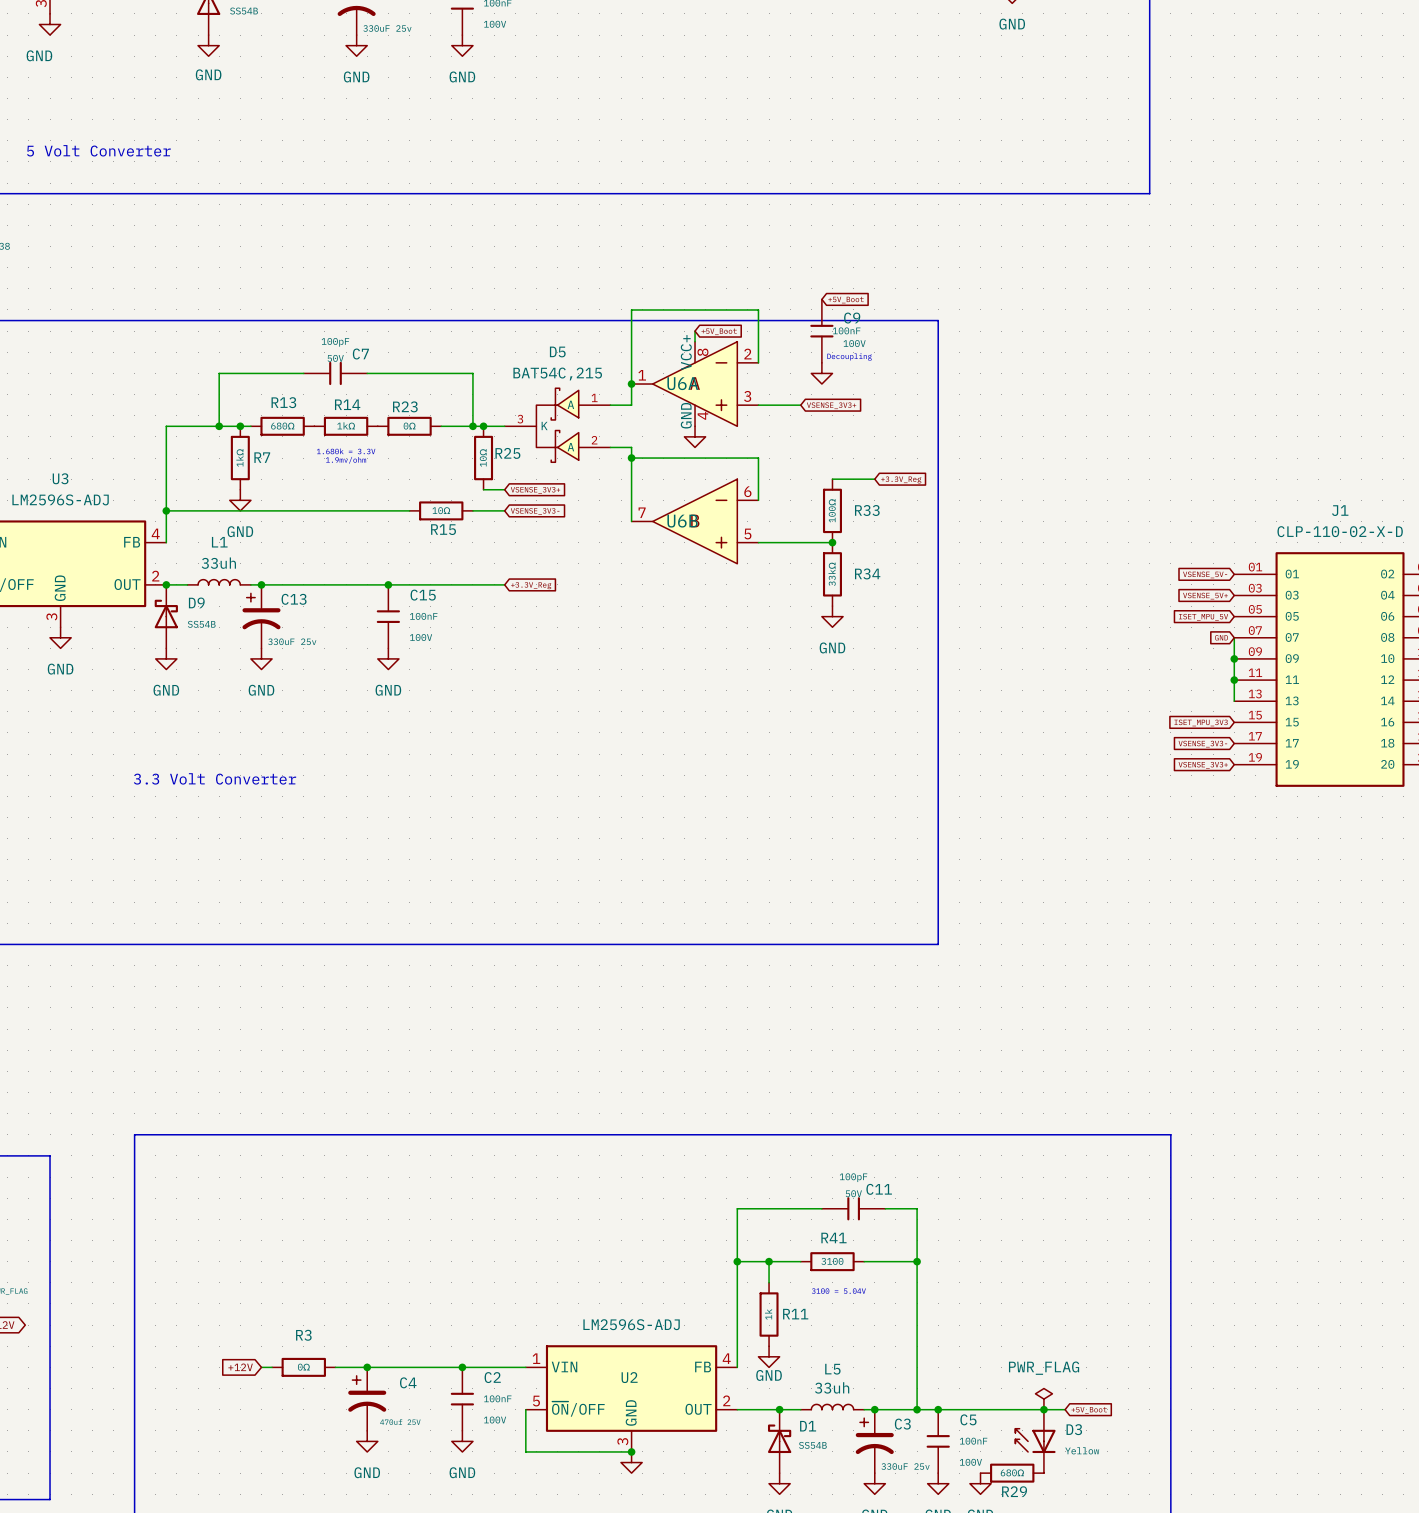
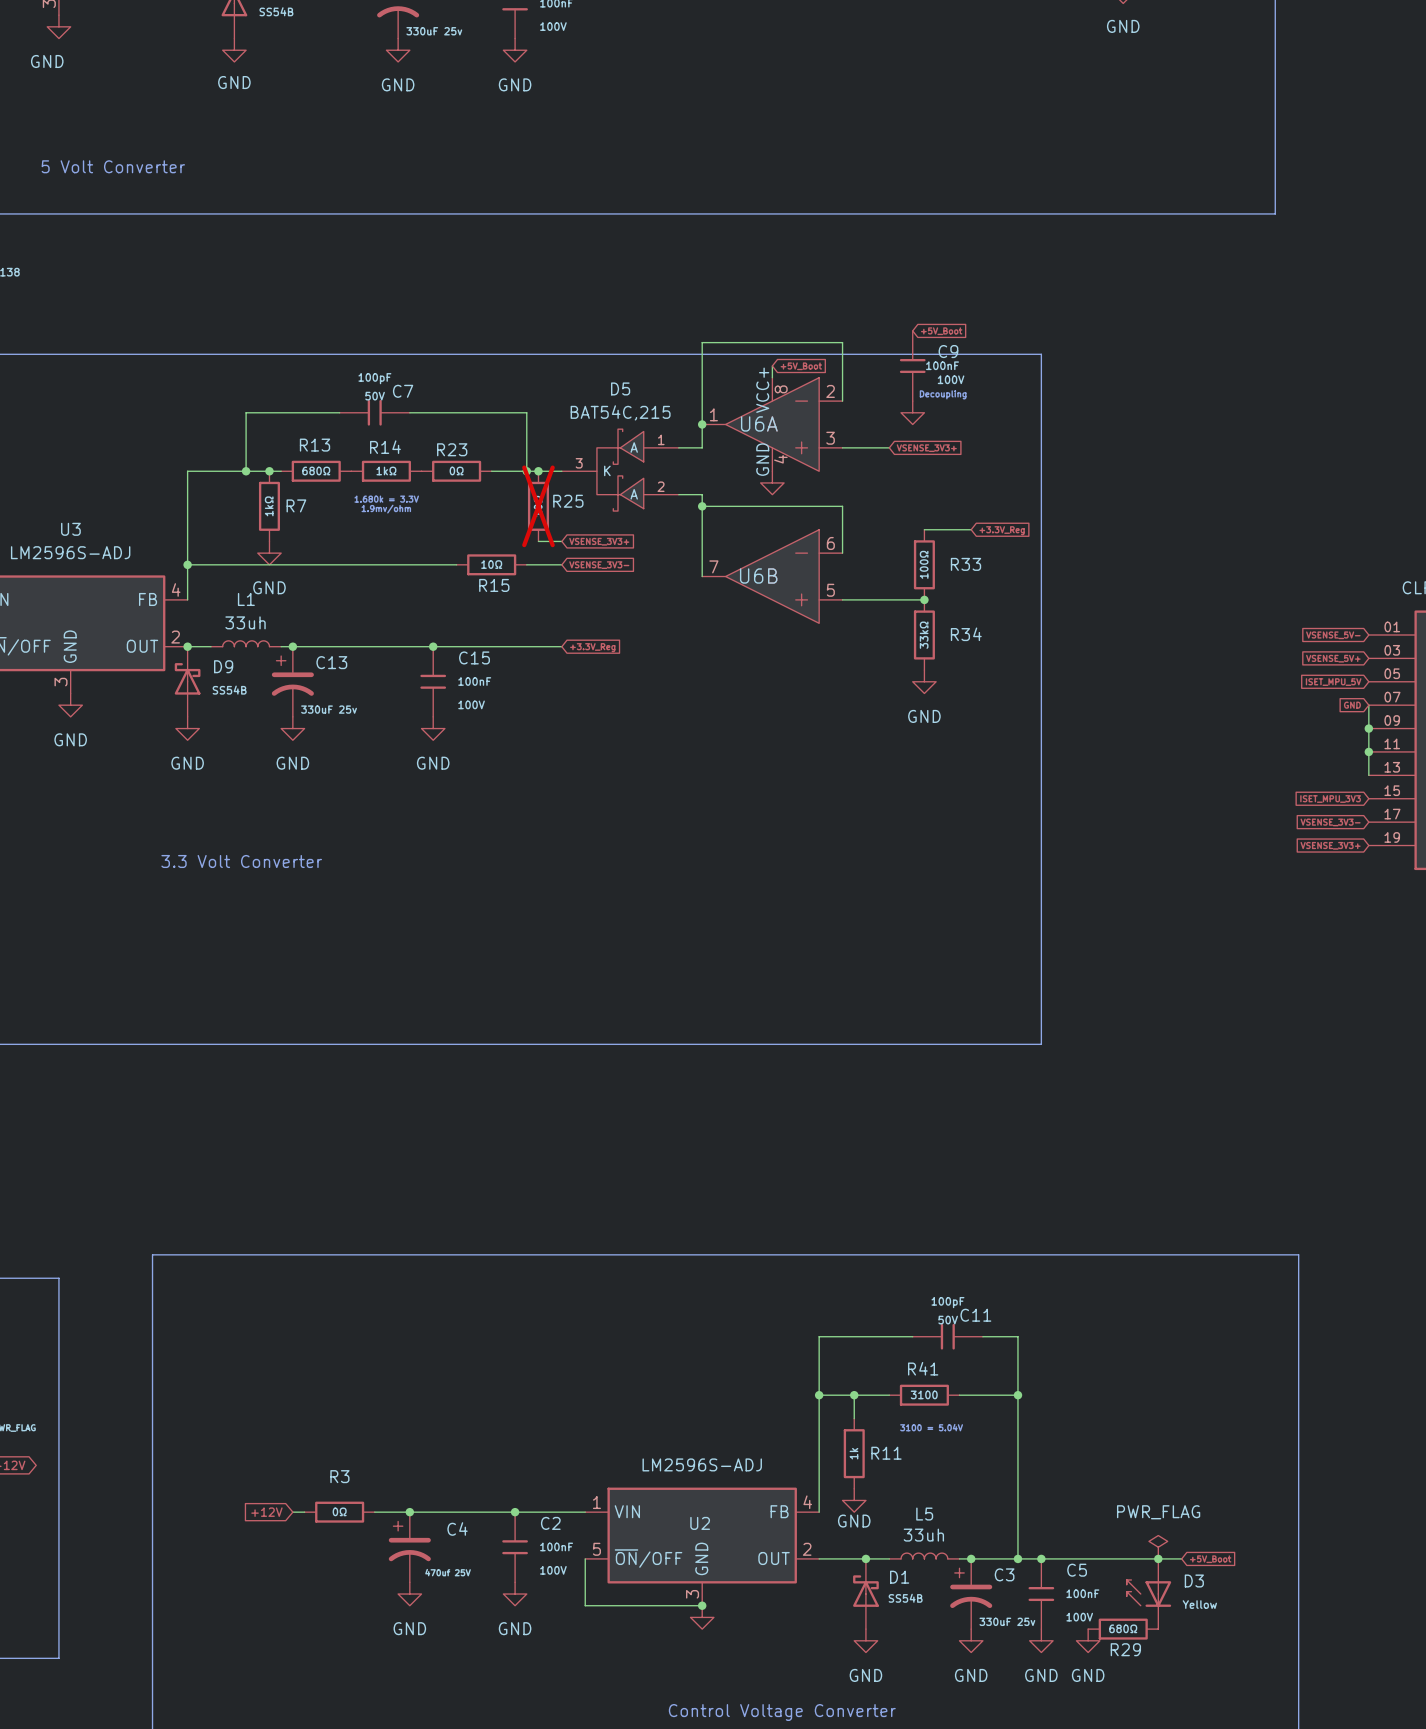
R25 do-not-place cross: none -> (538, 506)

